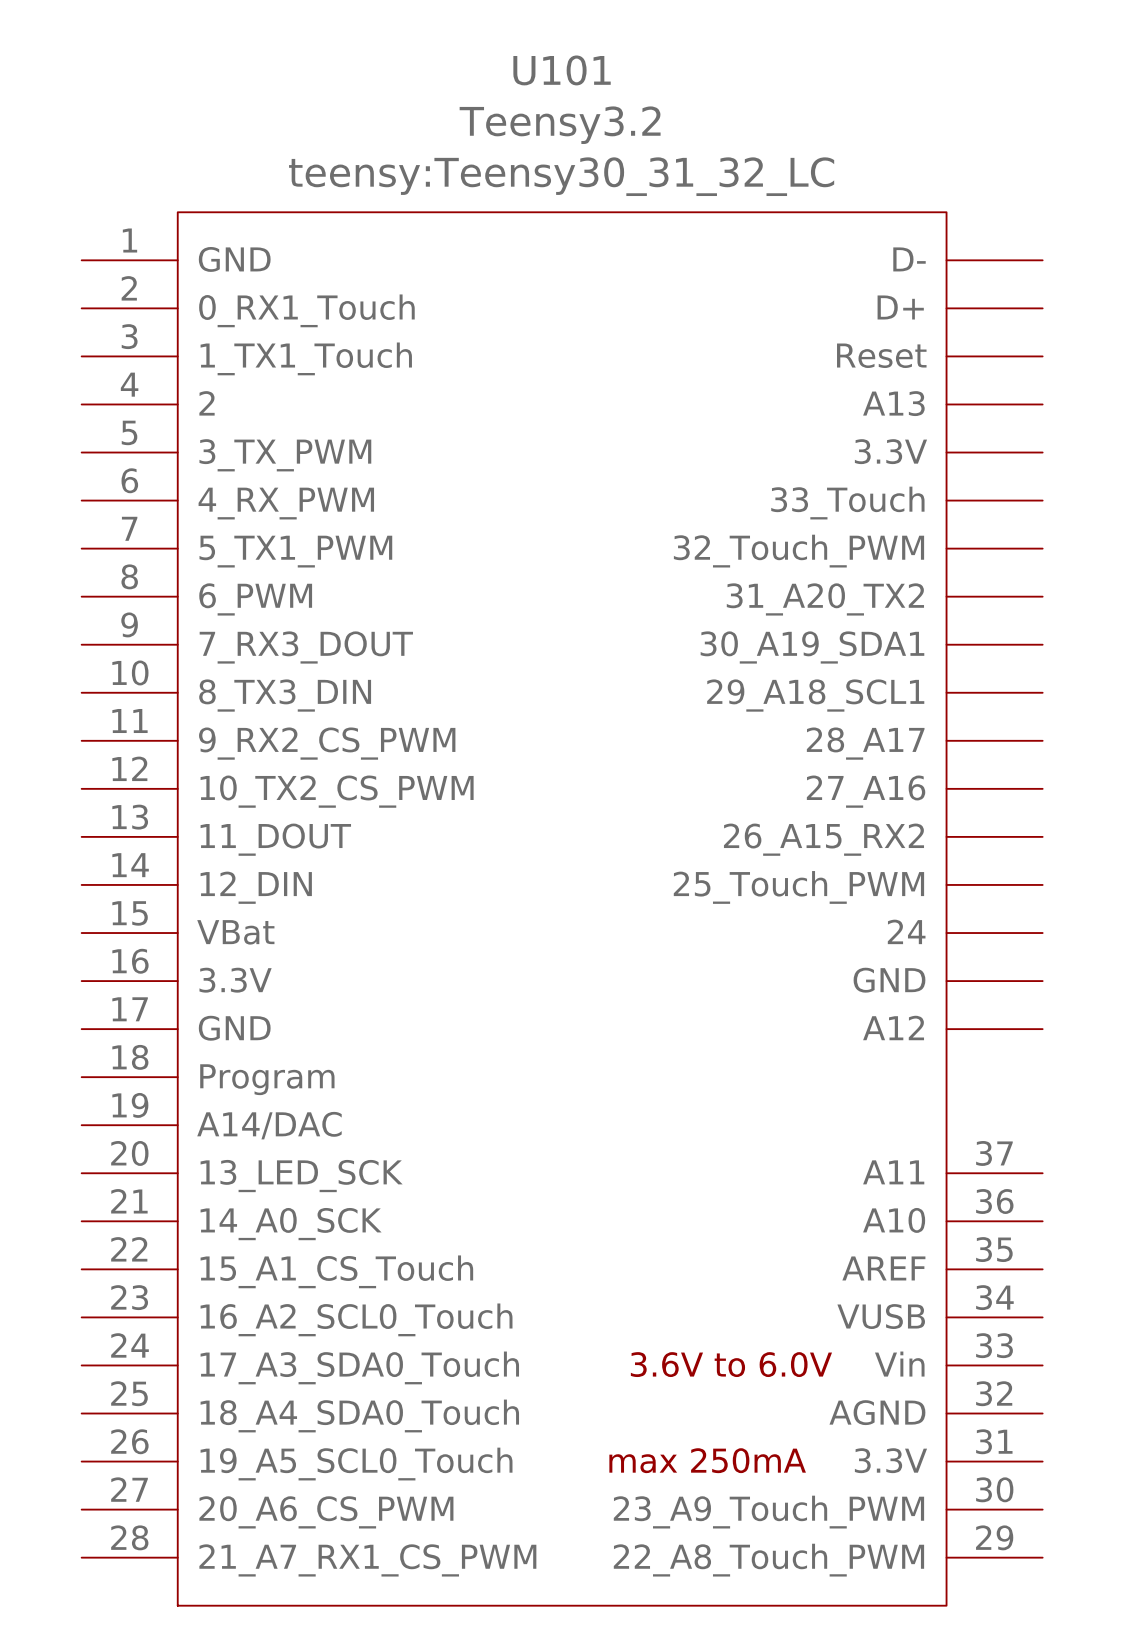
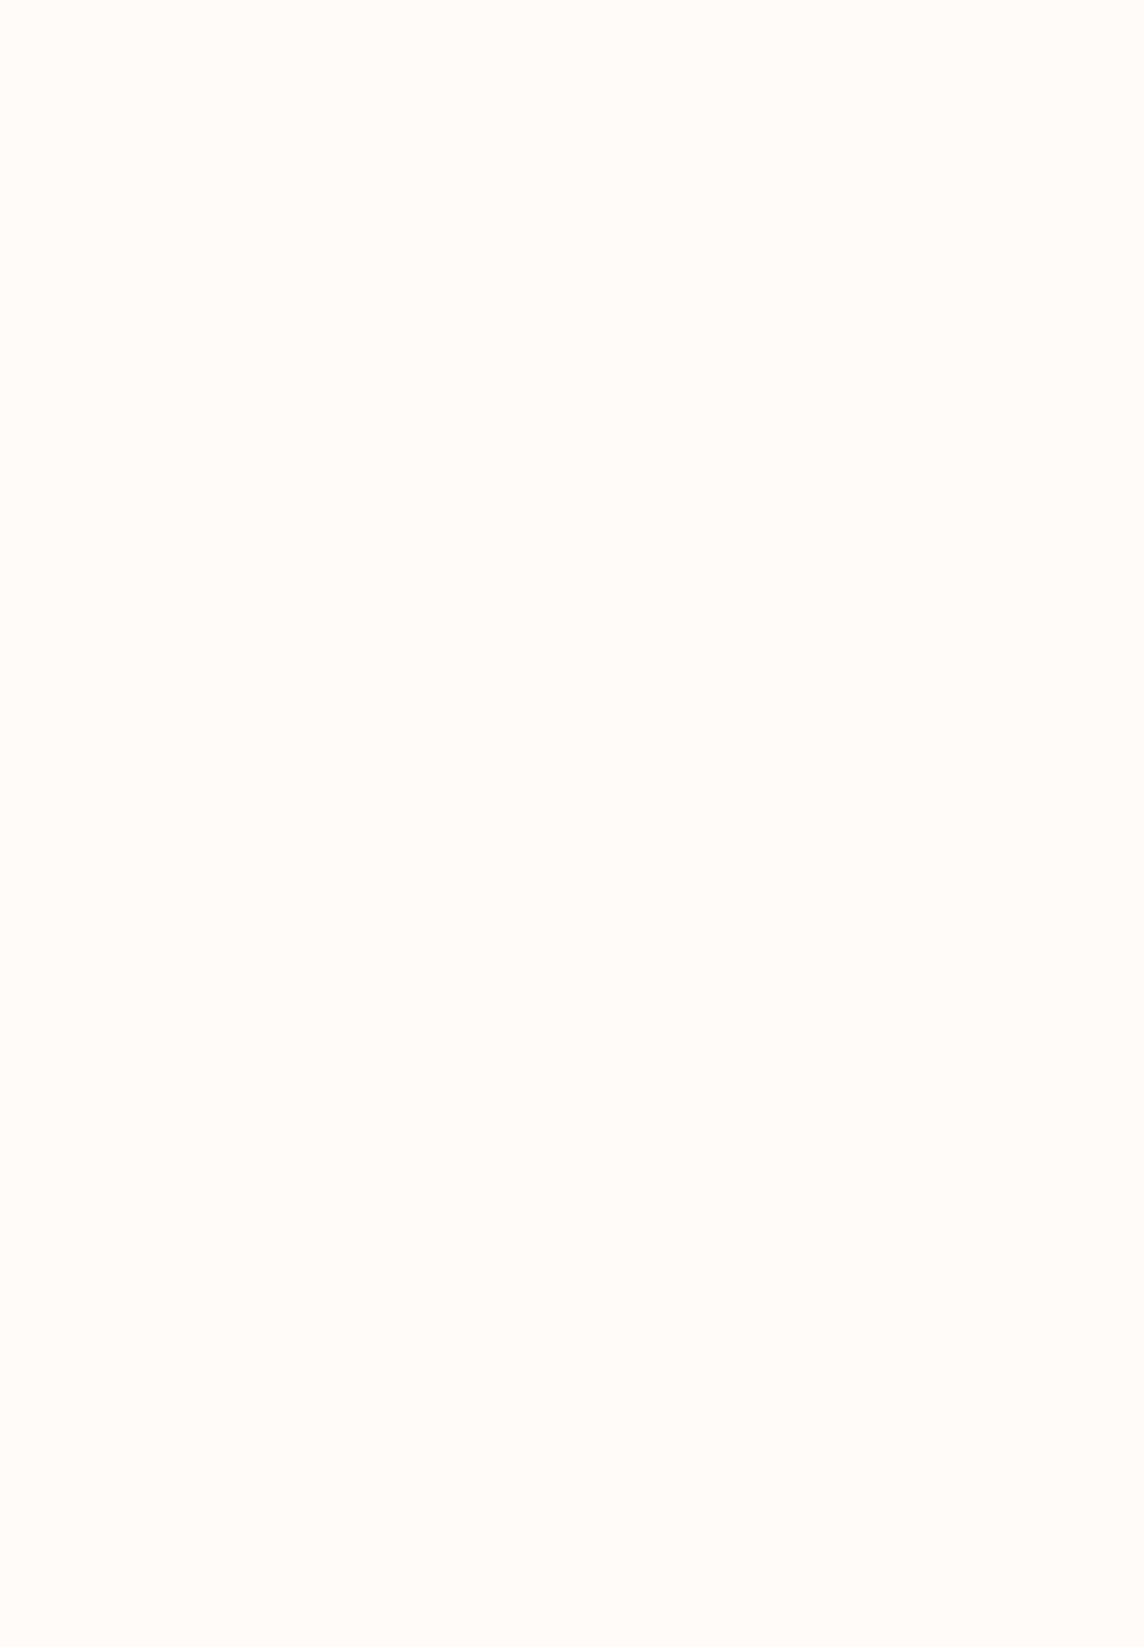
U101: Teensy3.2 (562, 908) -> none

